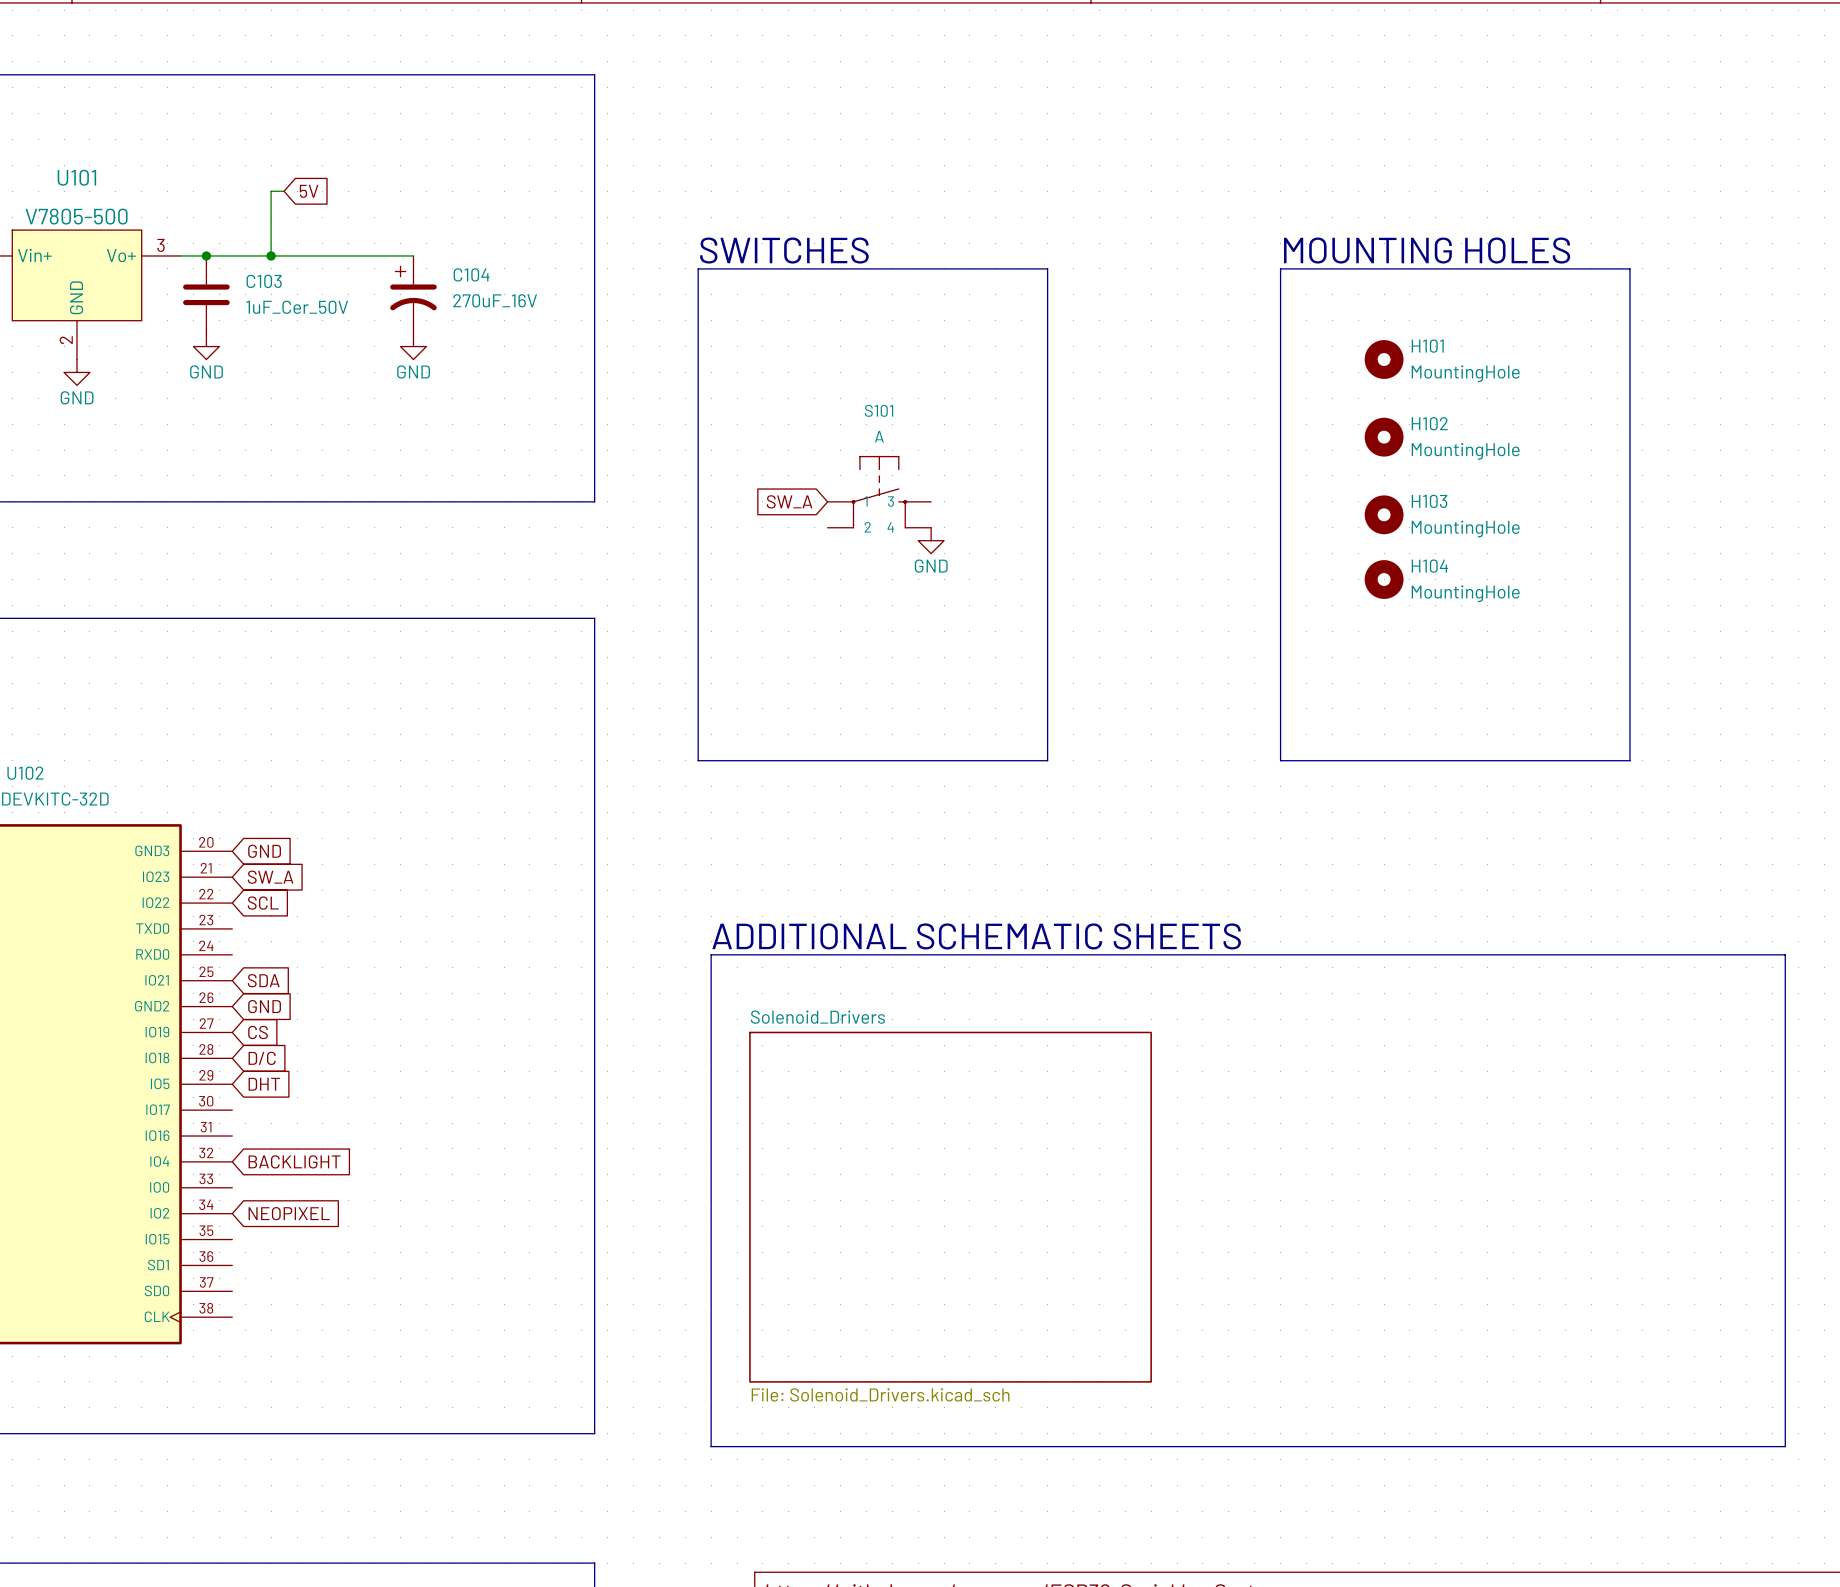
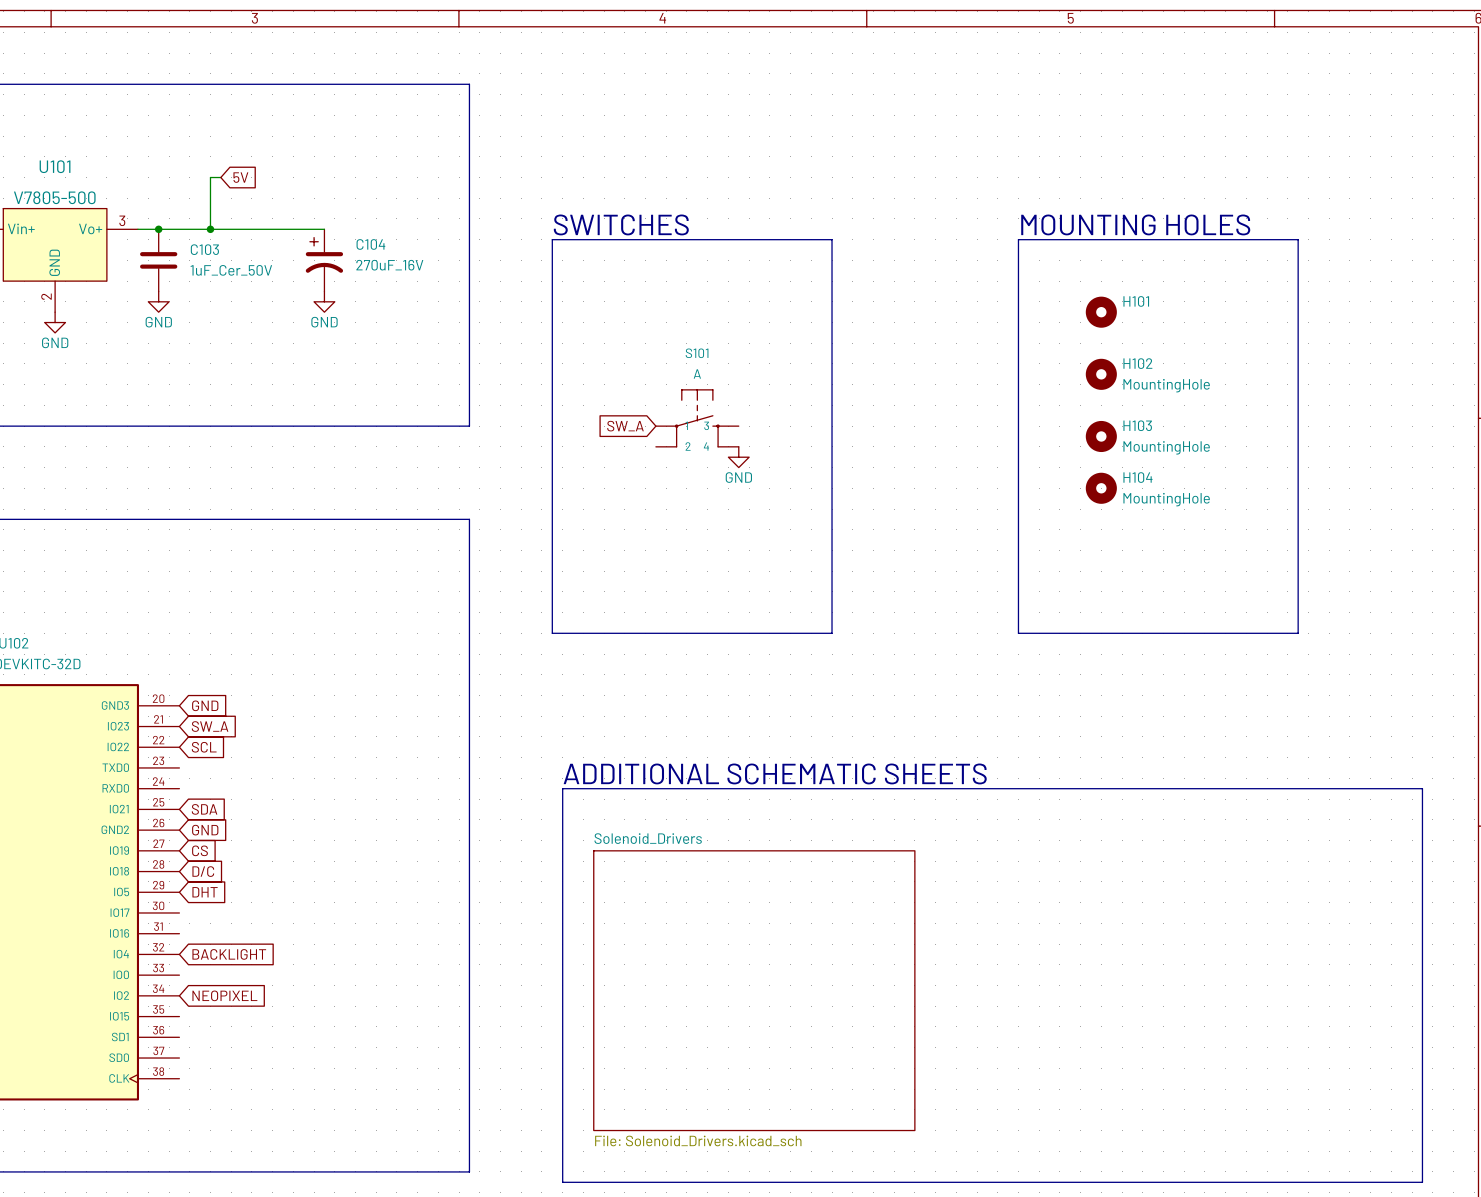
H101 value: MountingHole (1465, 373) -> none

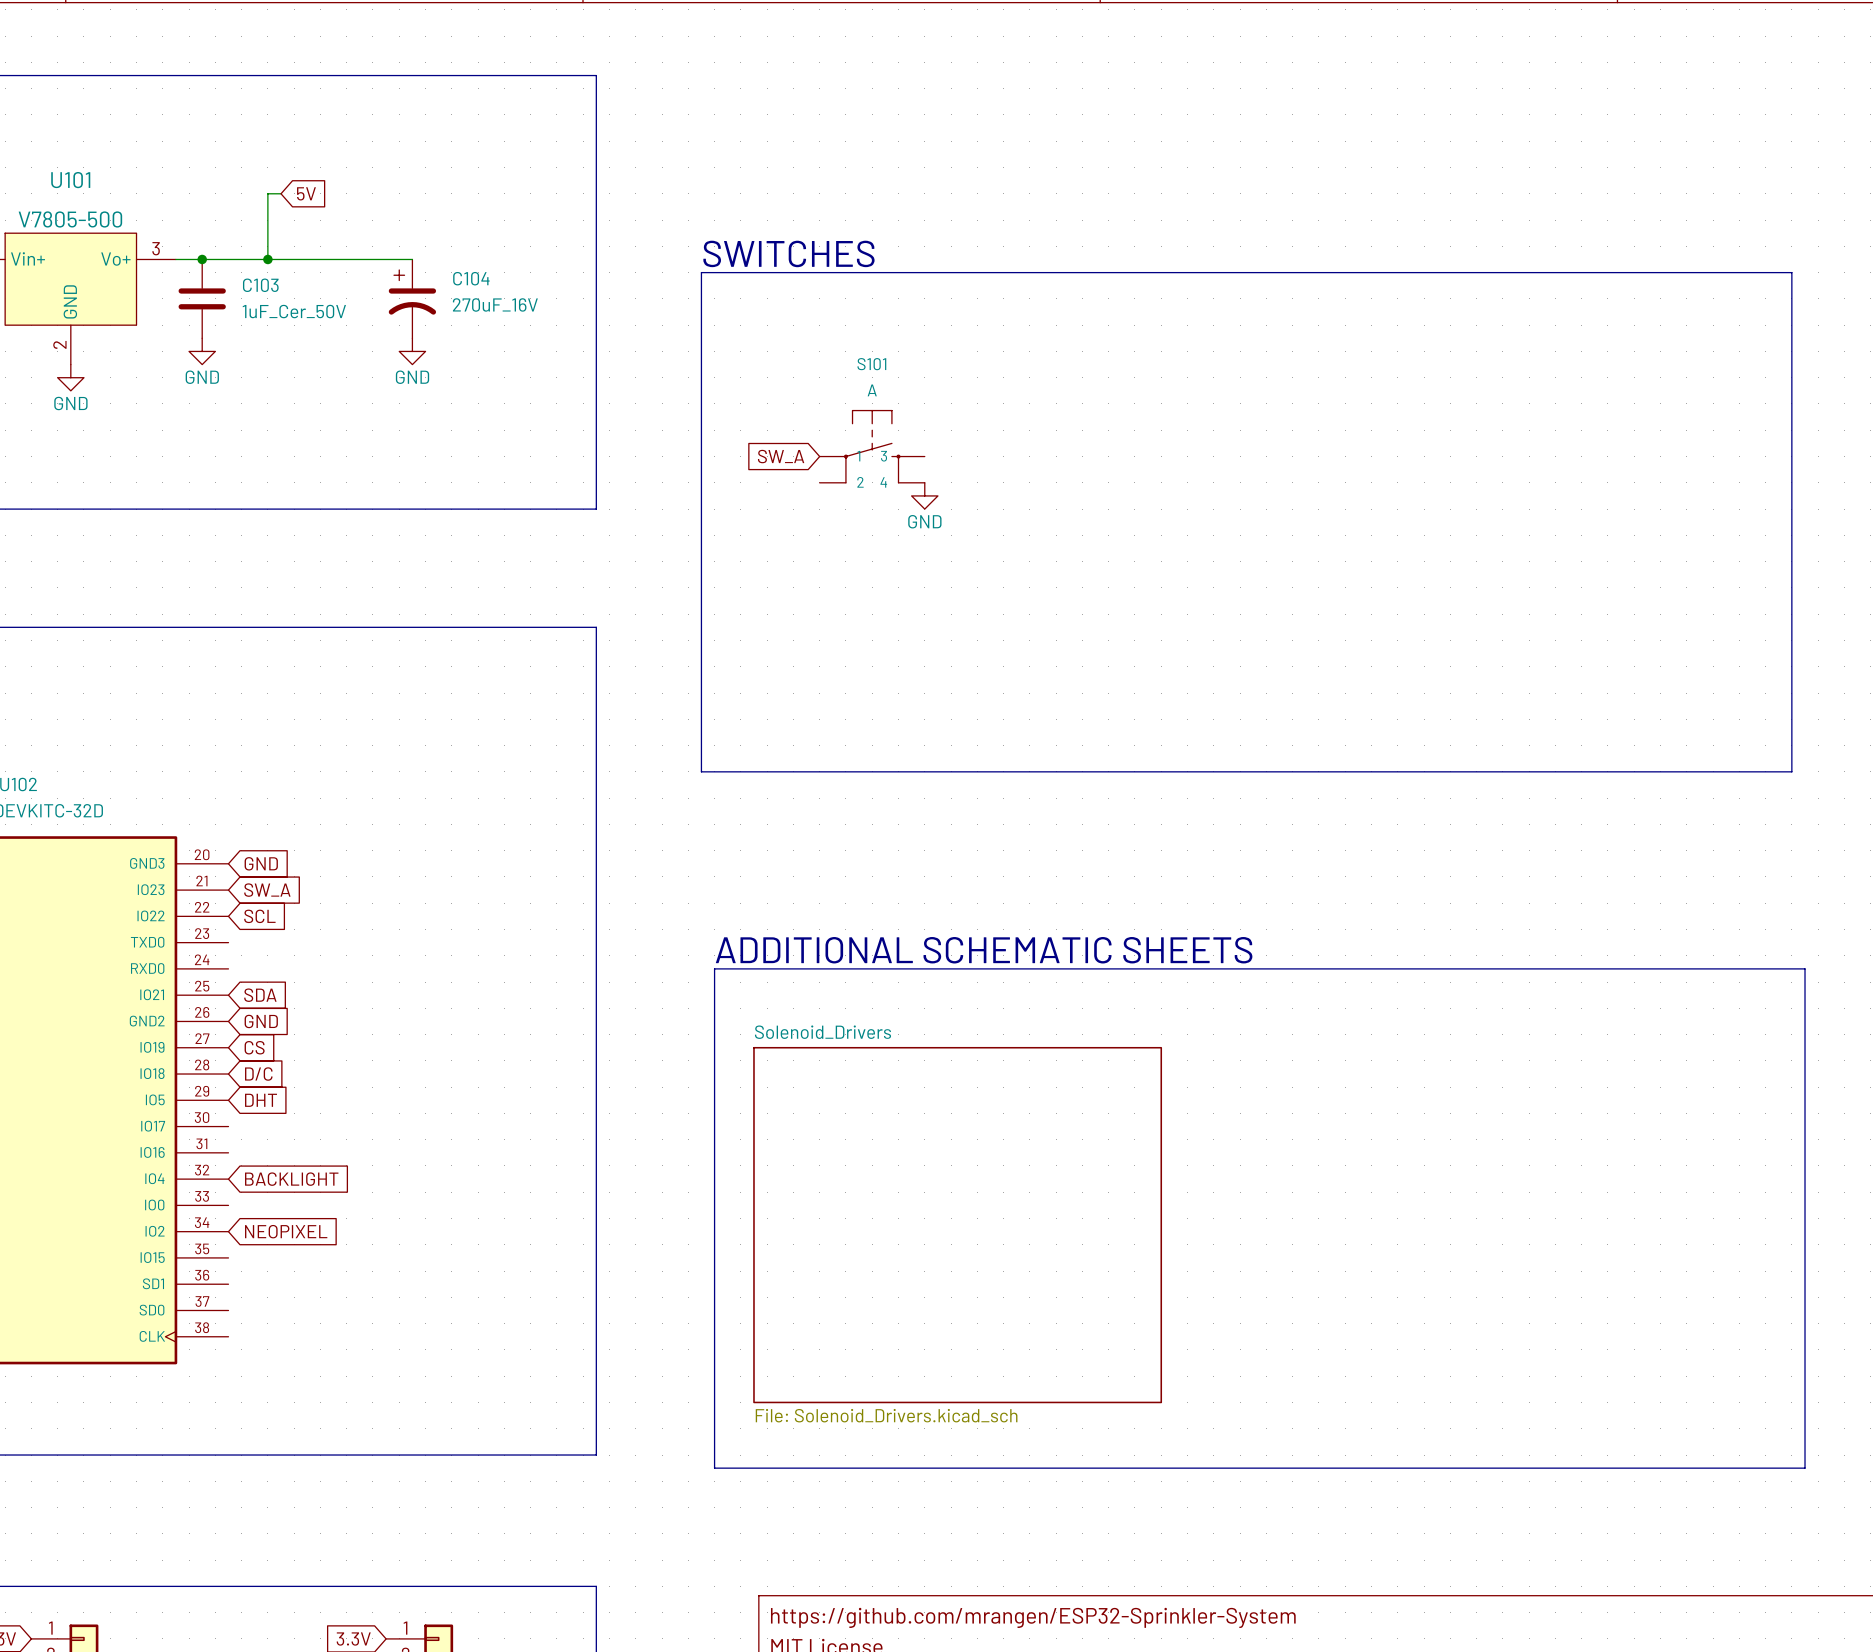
text: MOUNTING HOLES (1135, 224) -> none
line: (832, 239) (832, 633) -> (1056, 272) (1292, 272)
line: (1018, 239) (1018, 633) -> (1056, 771) (1292, 771)
line: (1298, 239) (1298, 633) -> (1647, 272) (1791, 272) (1791, 771) (1647, 771)
H101: (1101, 312) -> none
H102: MountingHole (1101, 374) -> none
S101 position: (697, 418) -> (872, 446)
global label position: SW_A (625, 426) -> SW_A (781, 456)
H103: MountingHole (1101, 436) -> none
power symbol position: GND (738, 457) -> GND (924, 495)
H104: MountingHole (1101, 488) -> none

